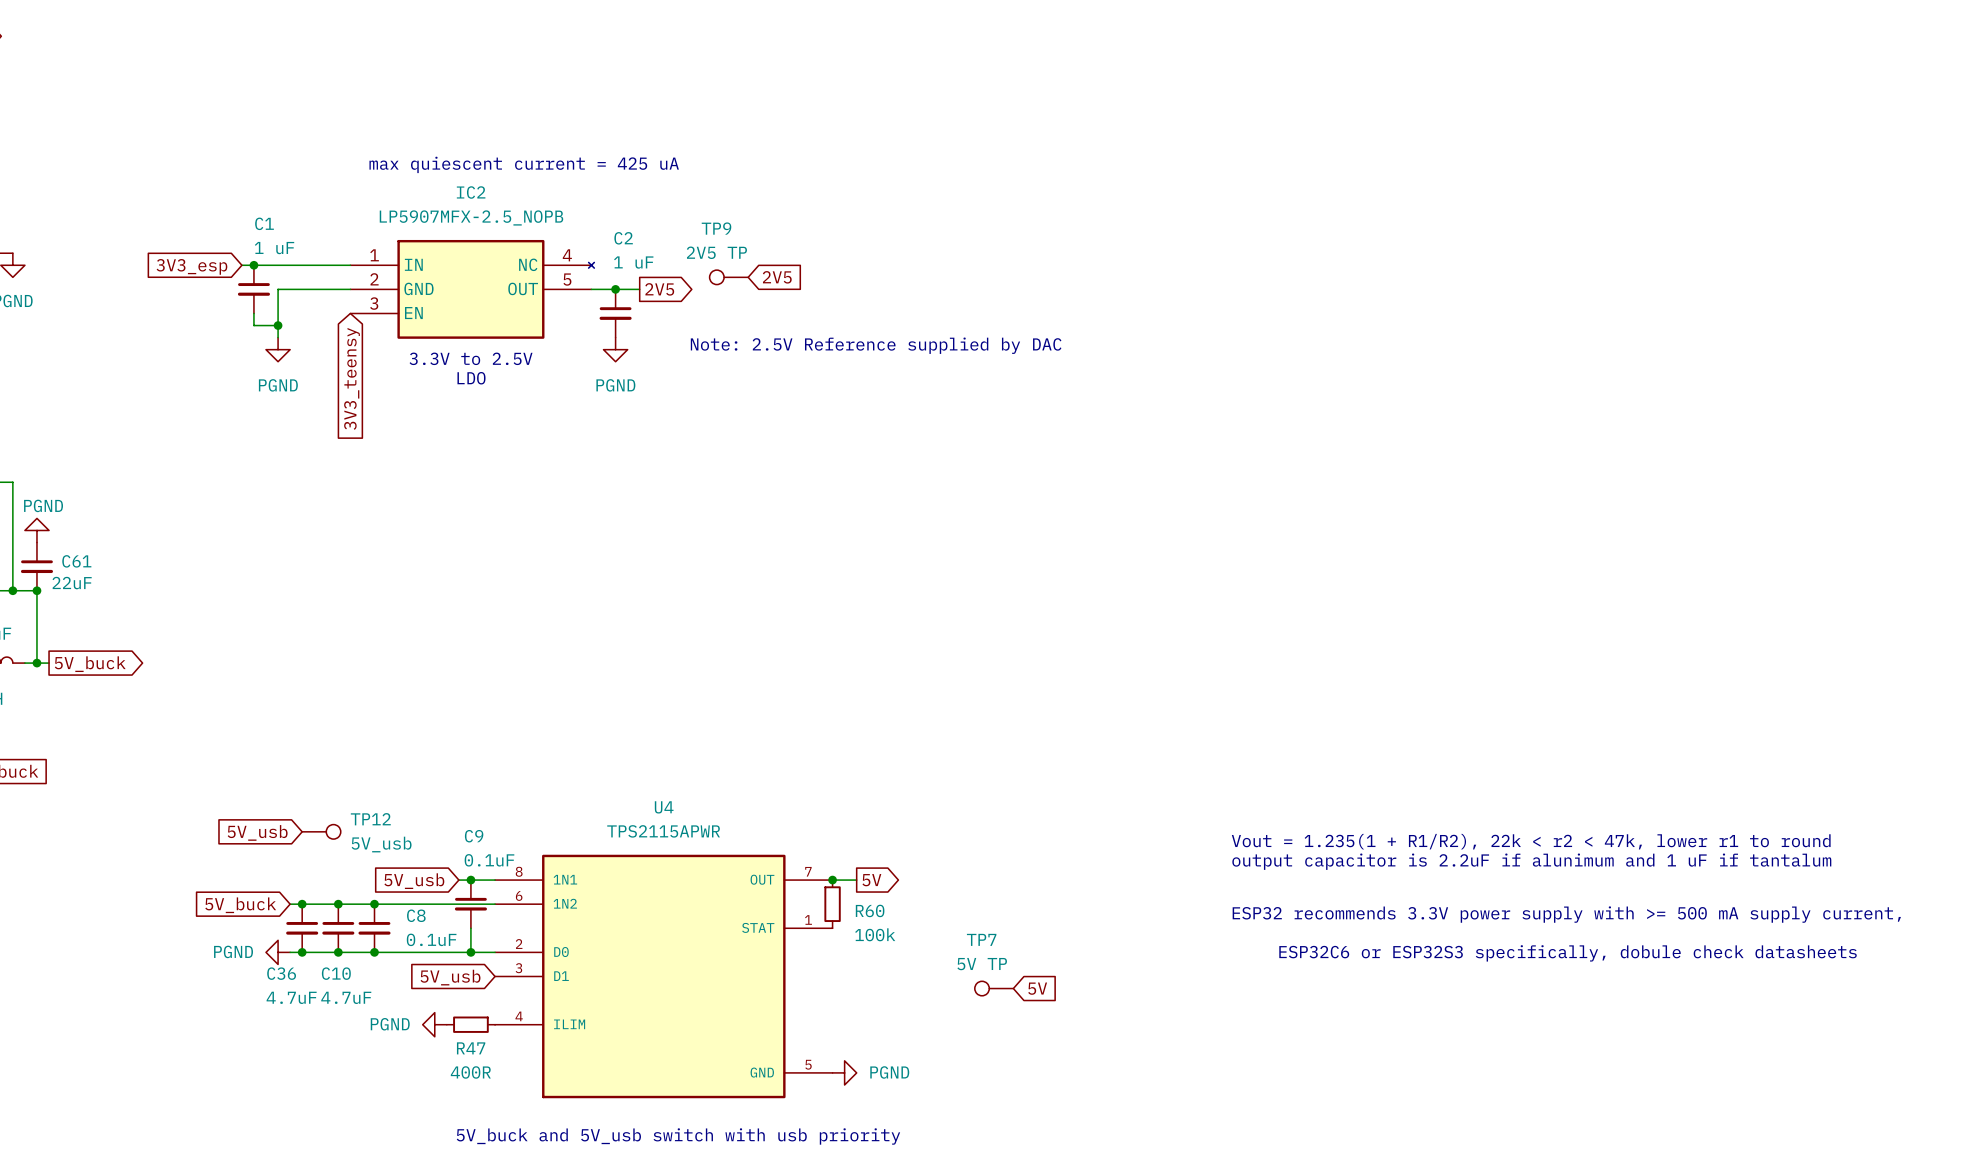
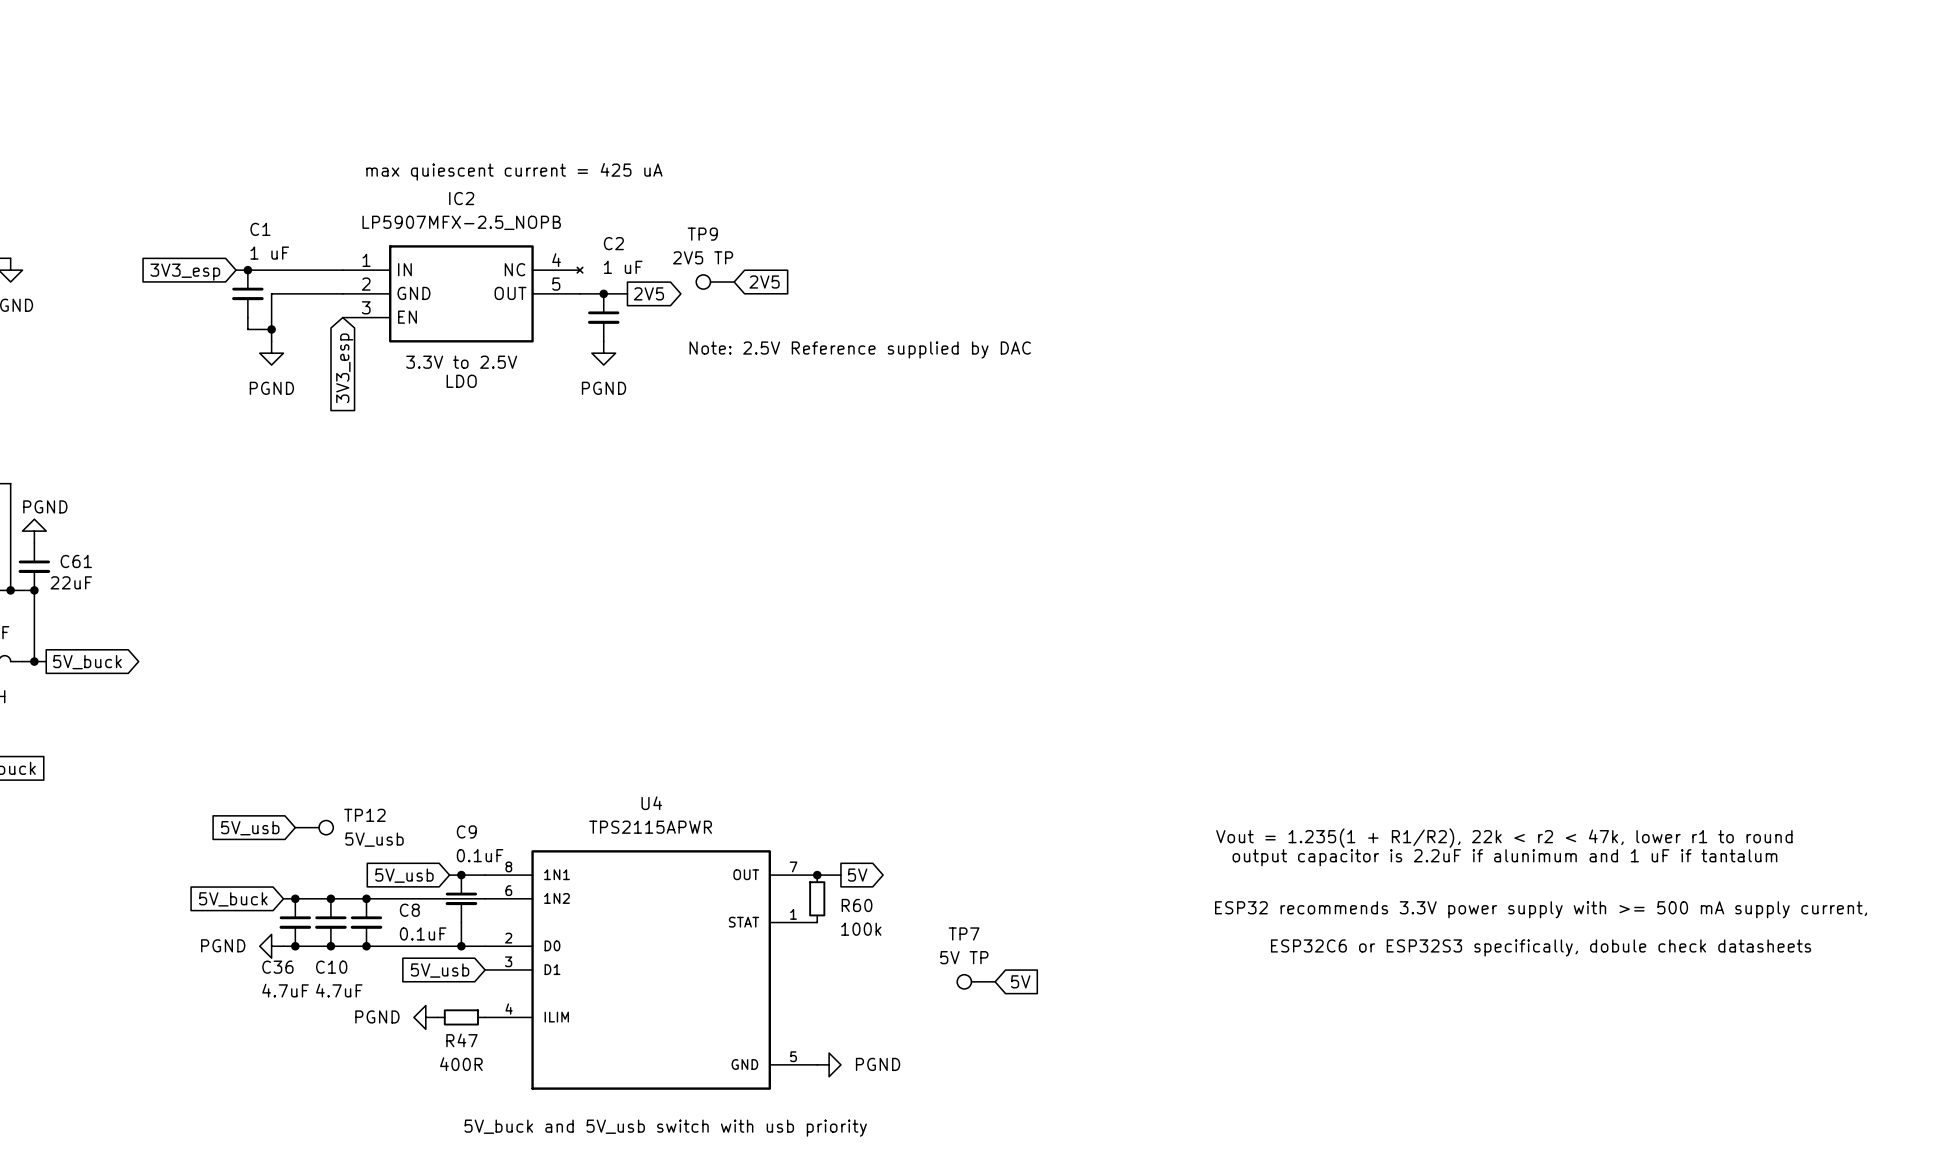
global label: 3V3_teensy (352, 378) -> 3V3_esp (344, 368)

